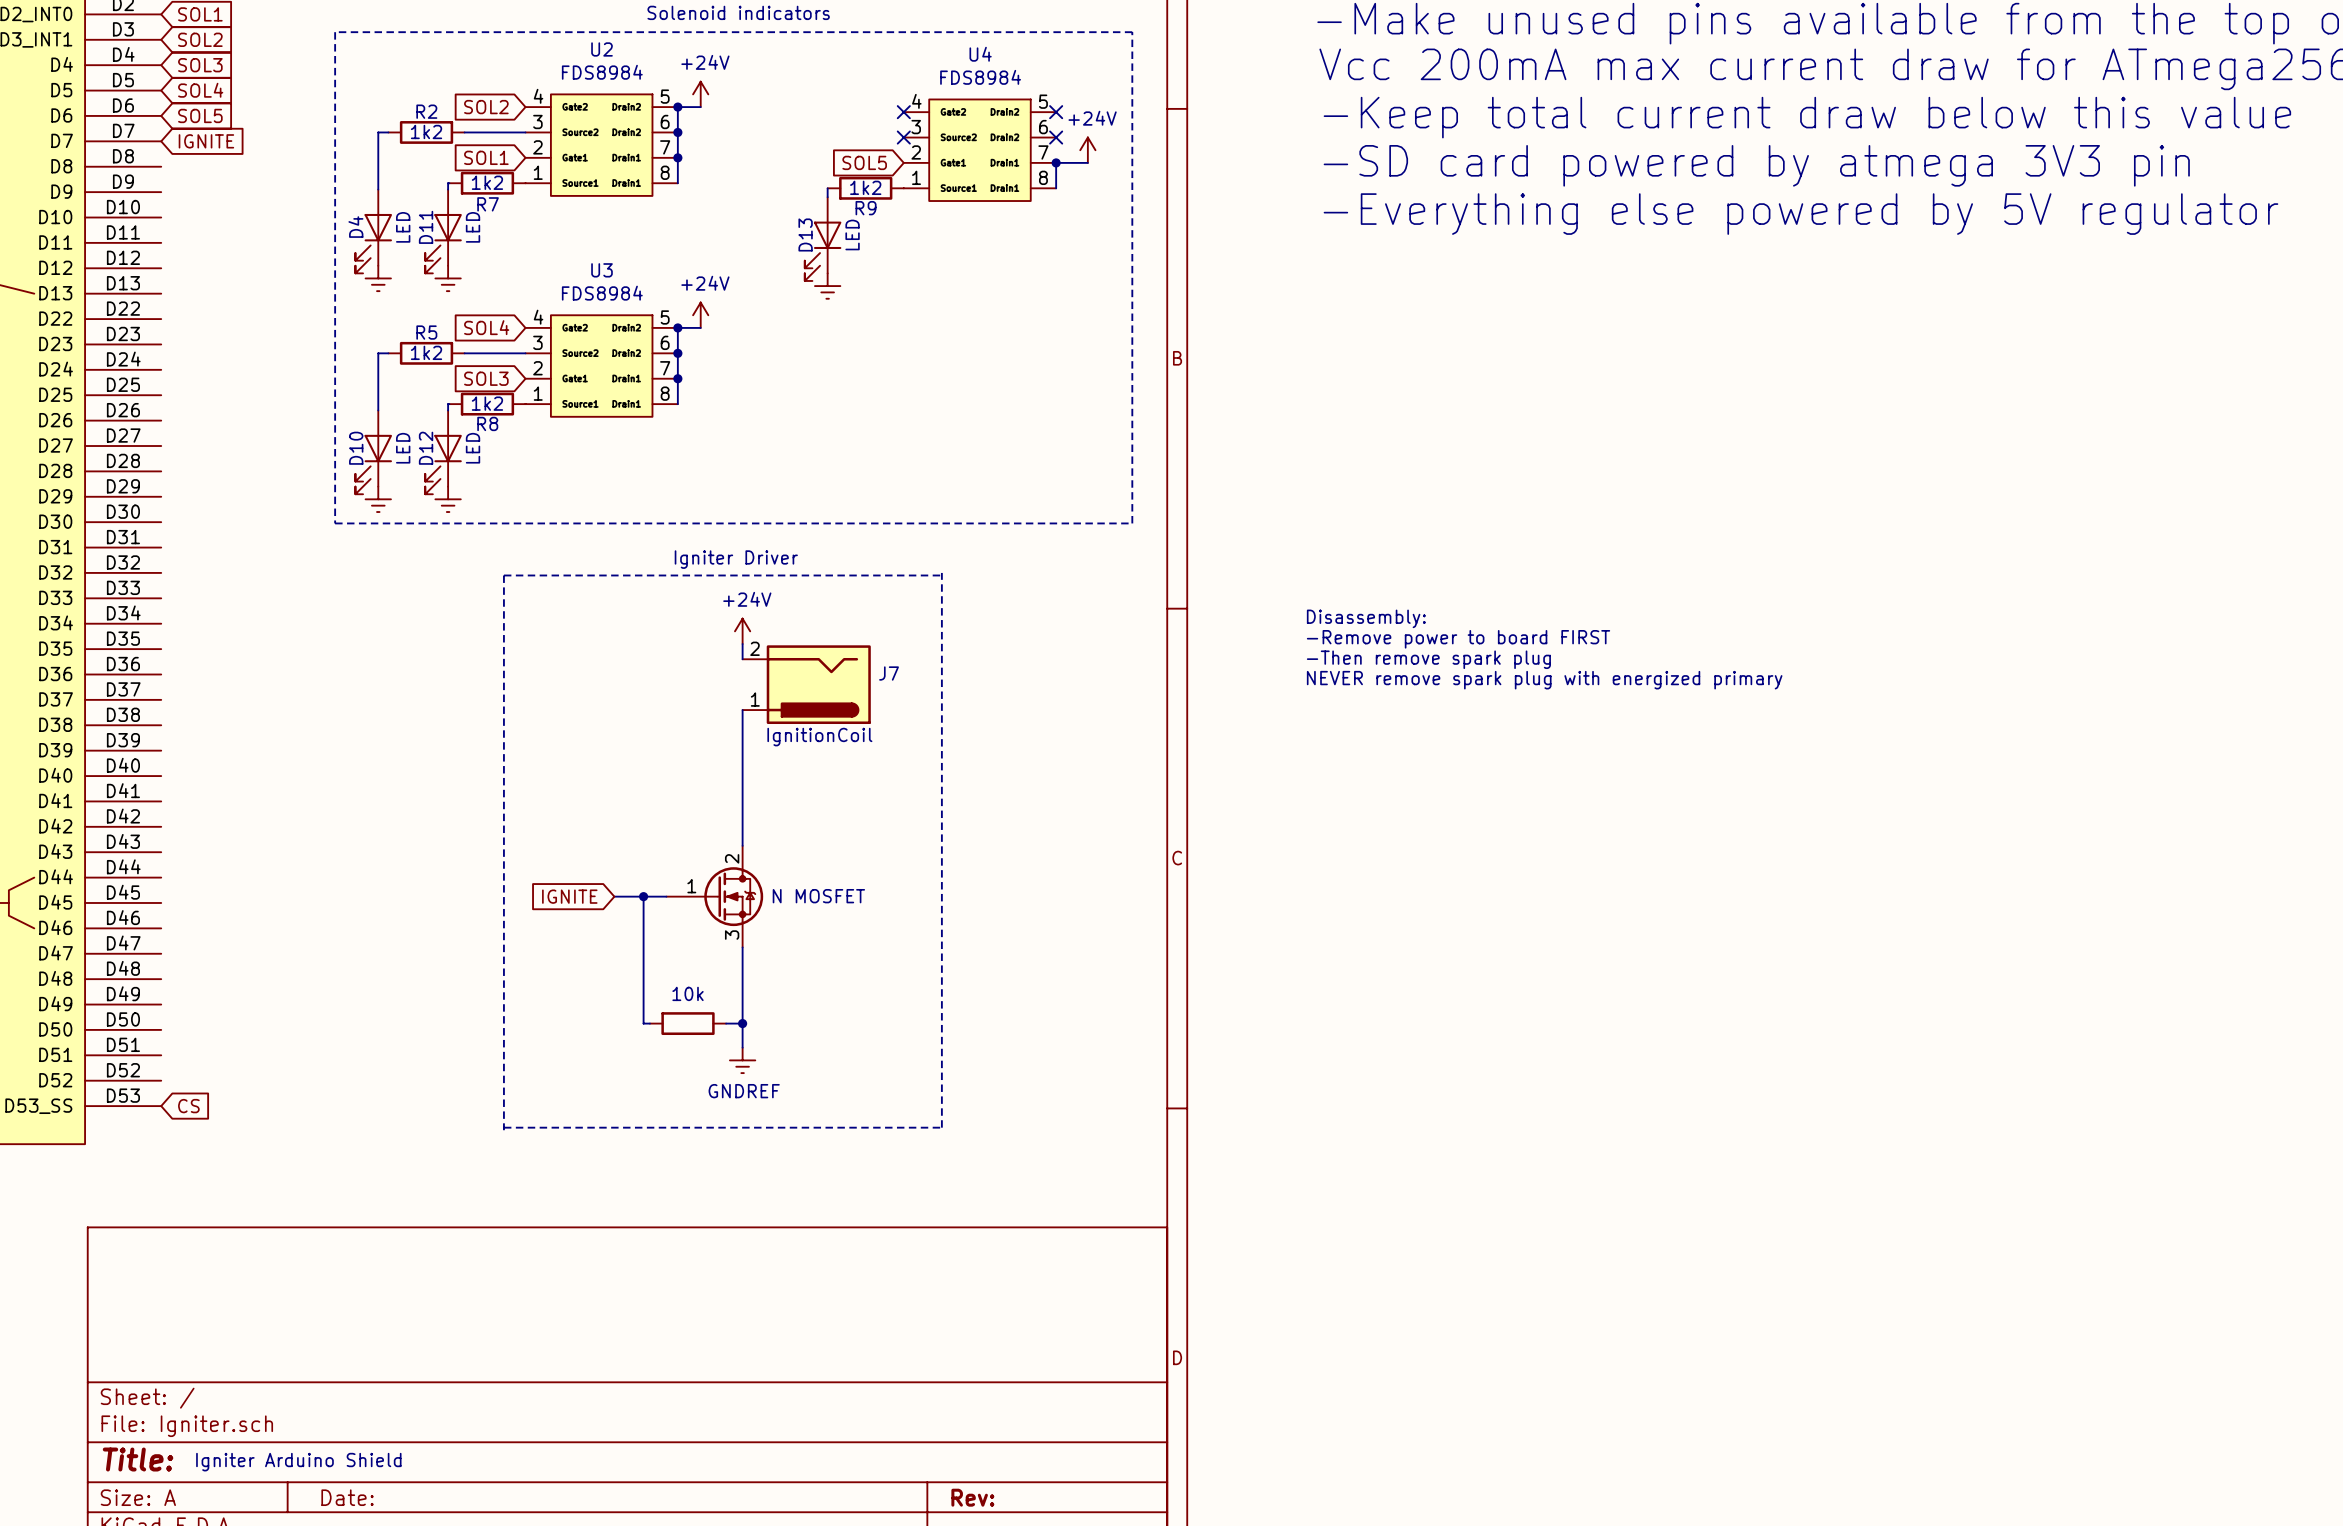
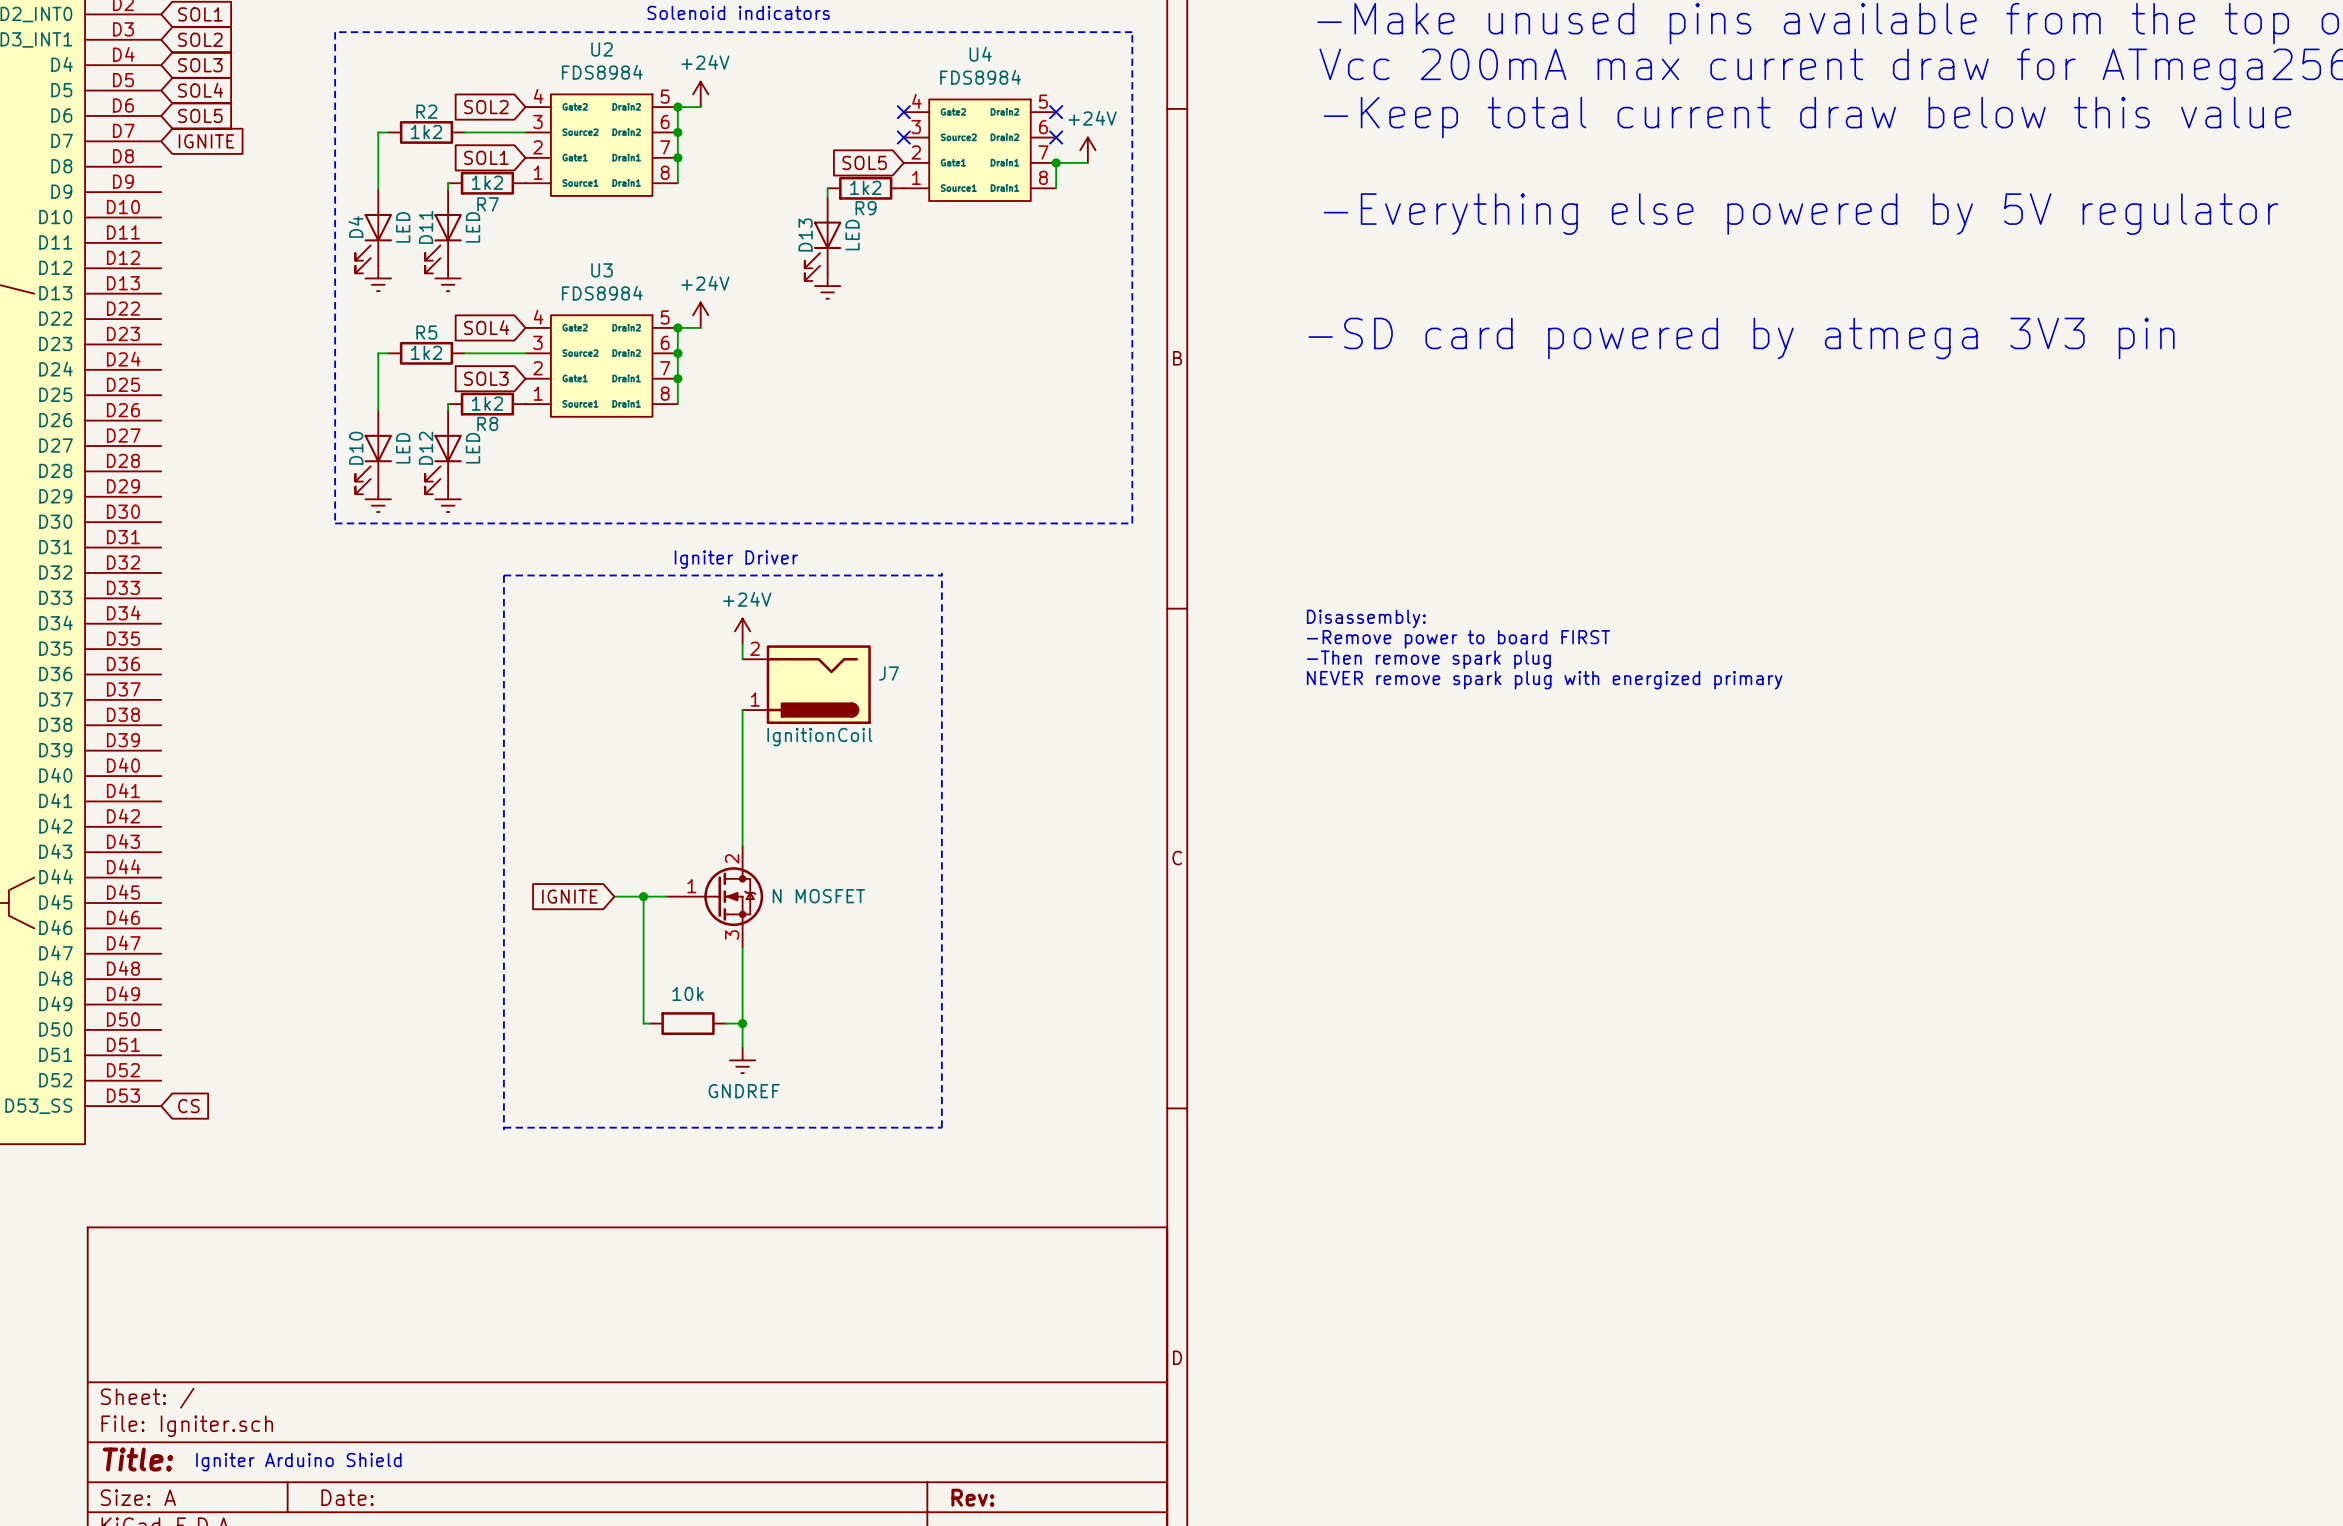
text position: -SD card powered by atmega 3V3 pin (1756, 165) -> -SD card powered by atmega 3V3 pin (1741, 338)

